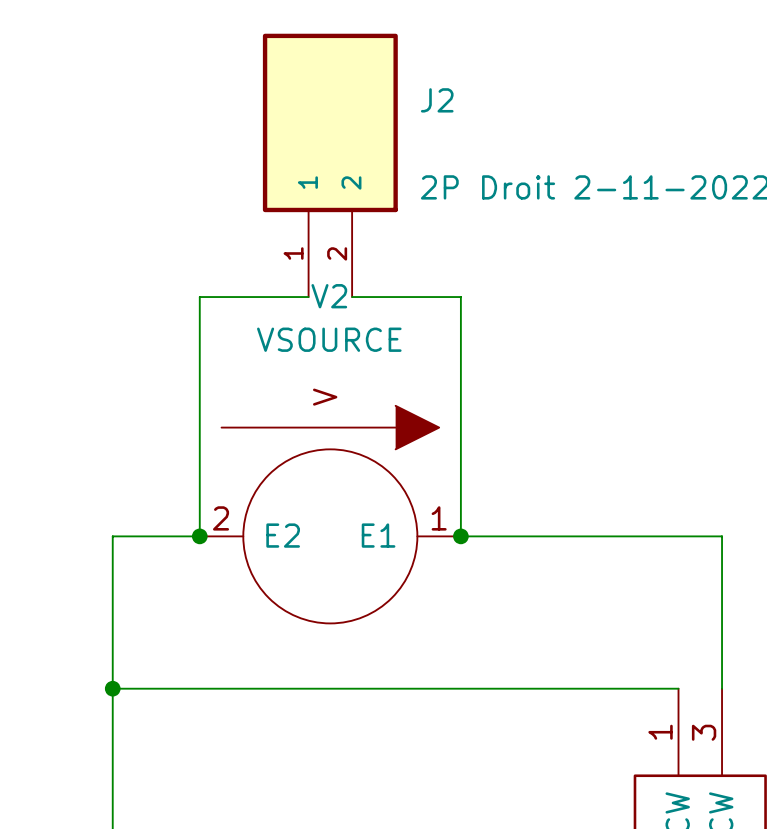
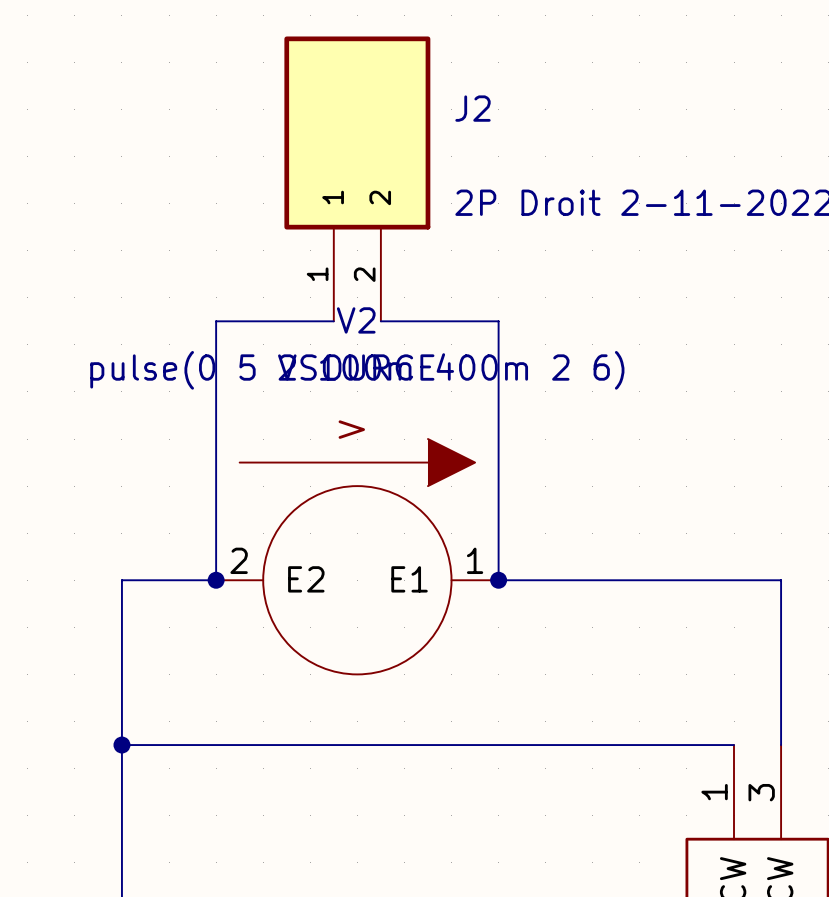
V2 text: none -> pulse(0 5 2 100m 400m 2 6) (357, 370)

